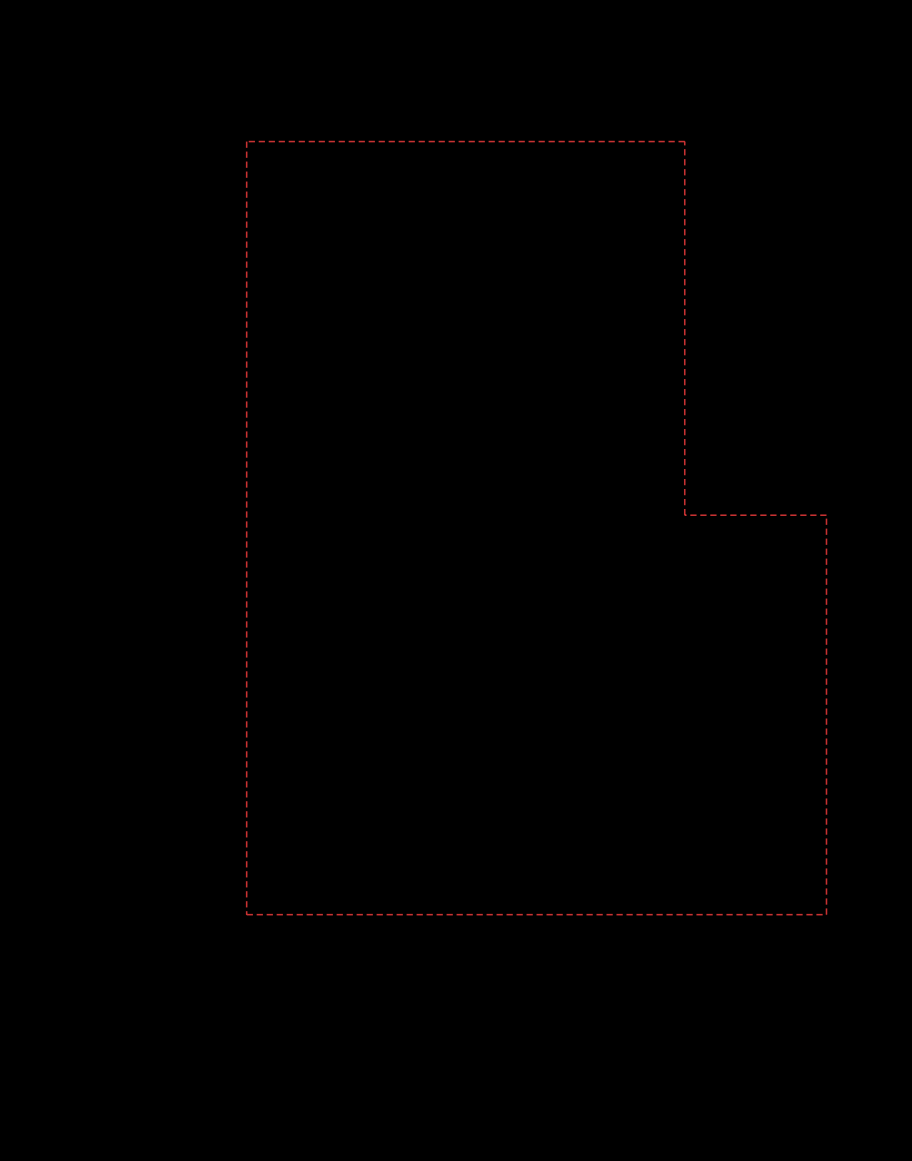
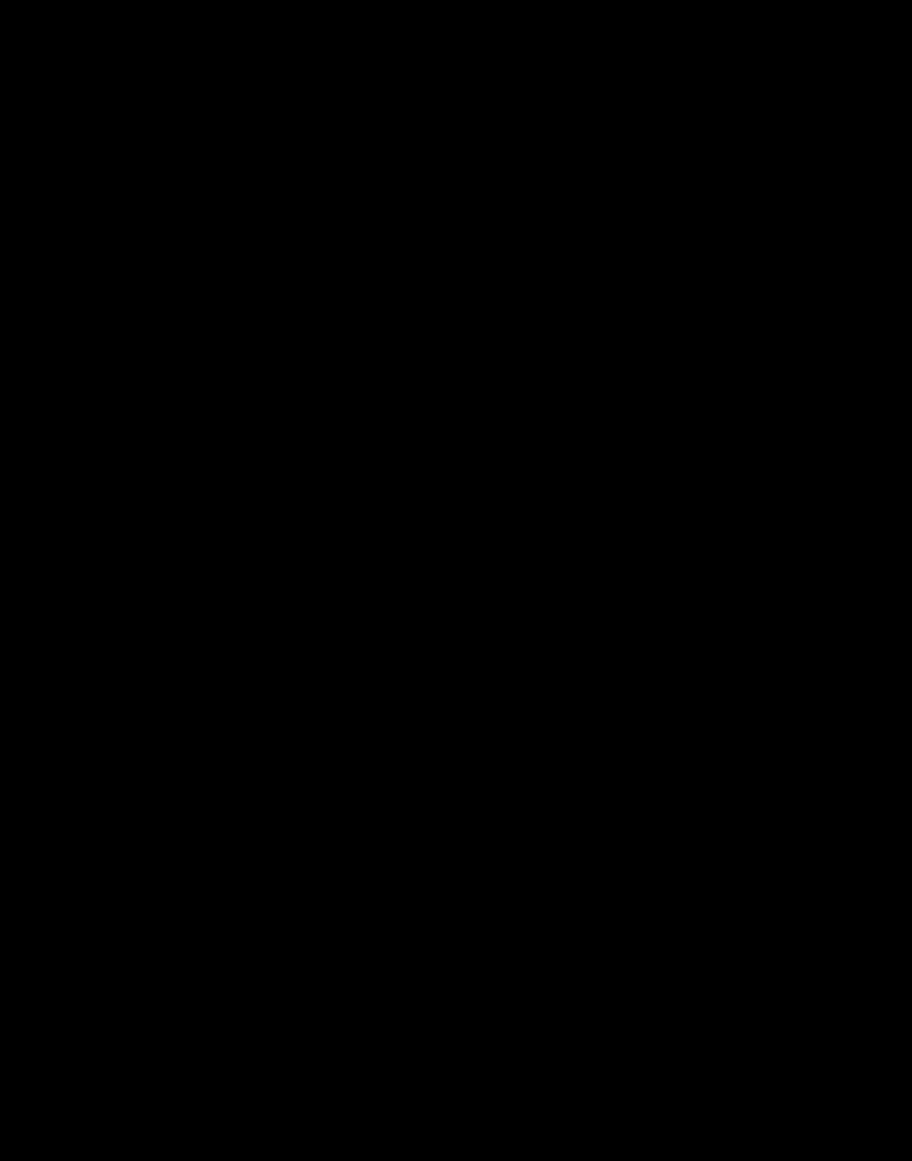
zone outline: (246, 141) (246, 914) (826, 914) (826, 515) (684, 515) (684, 141) (246, 141) -> none

